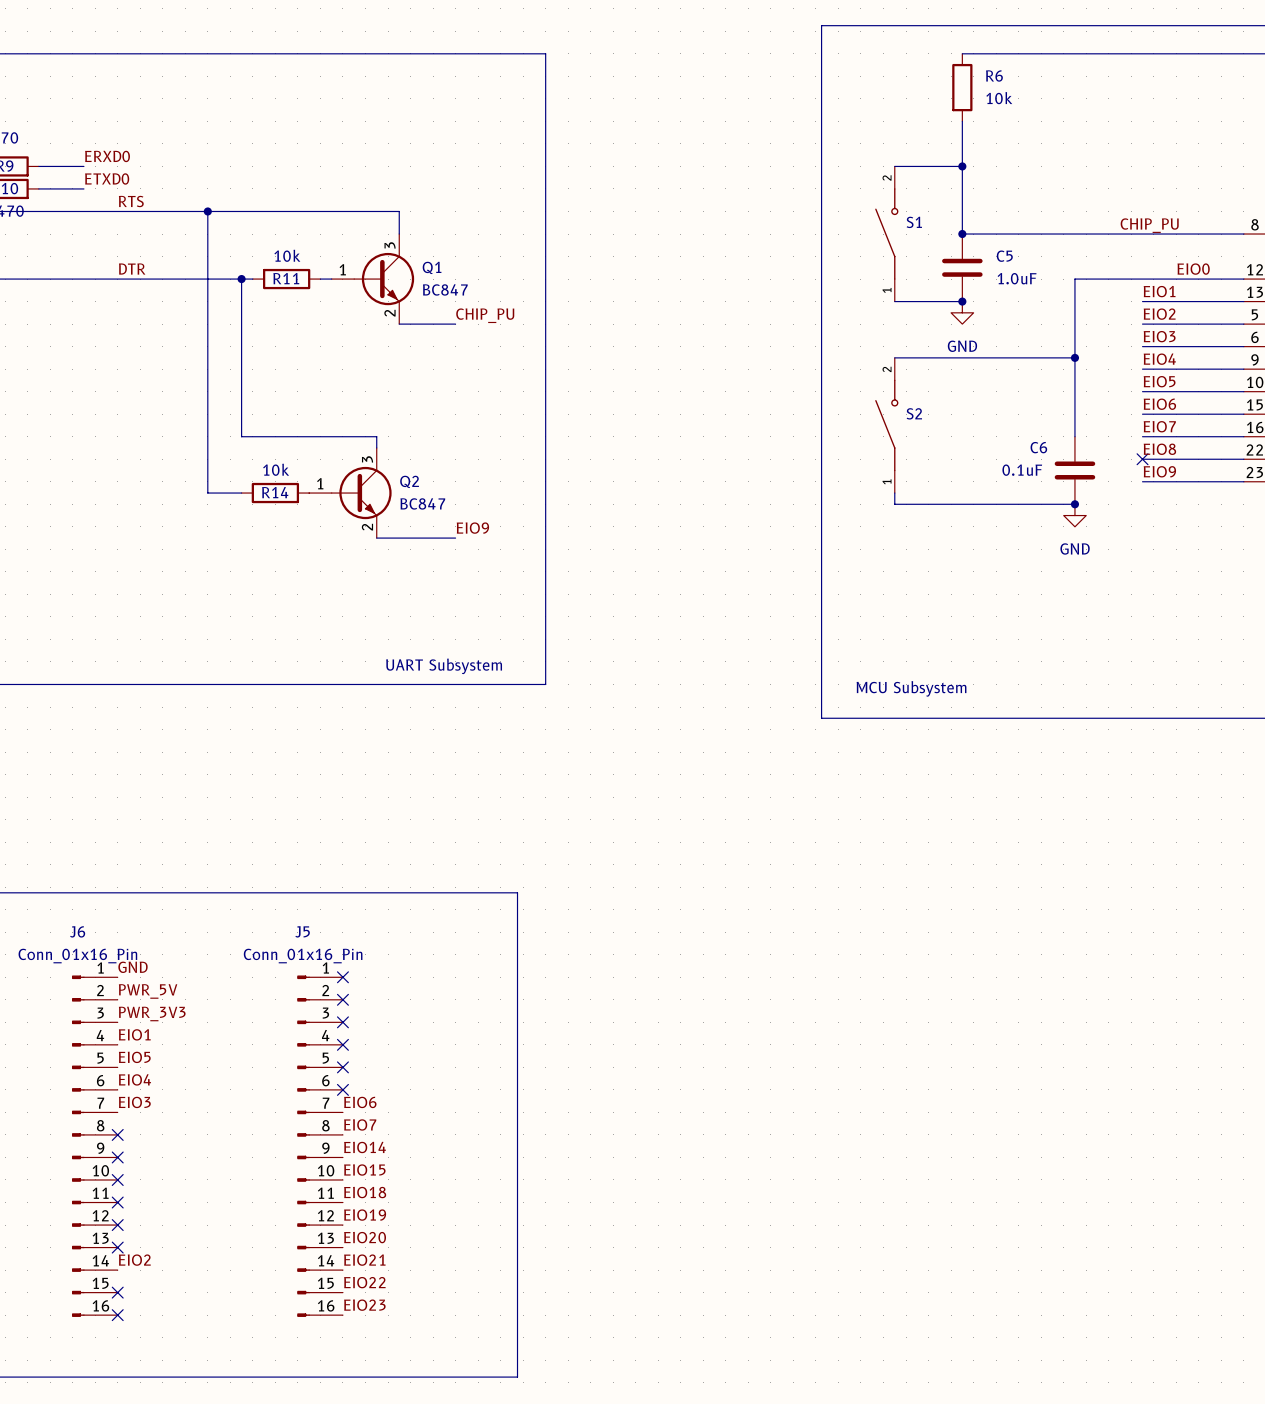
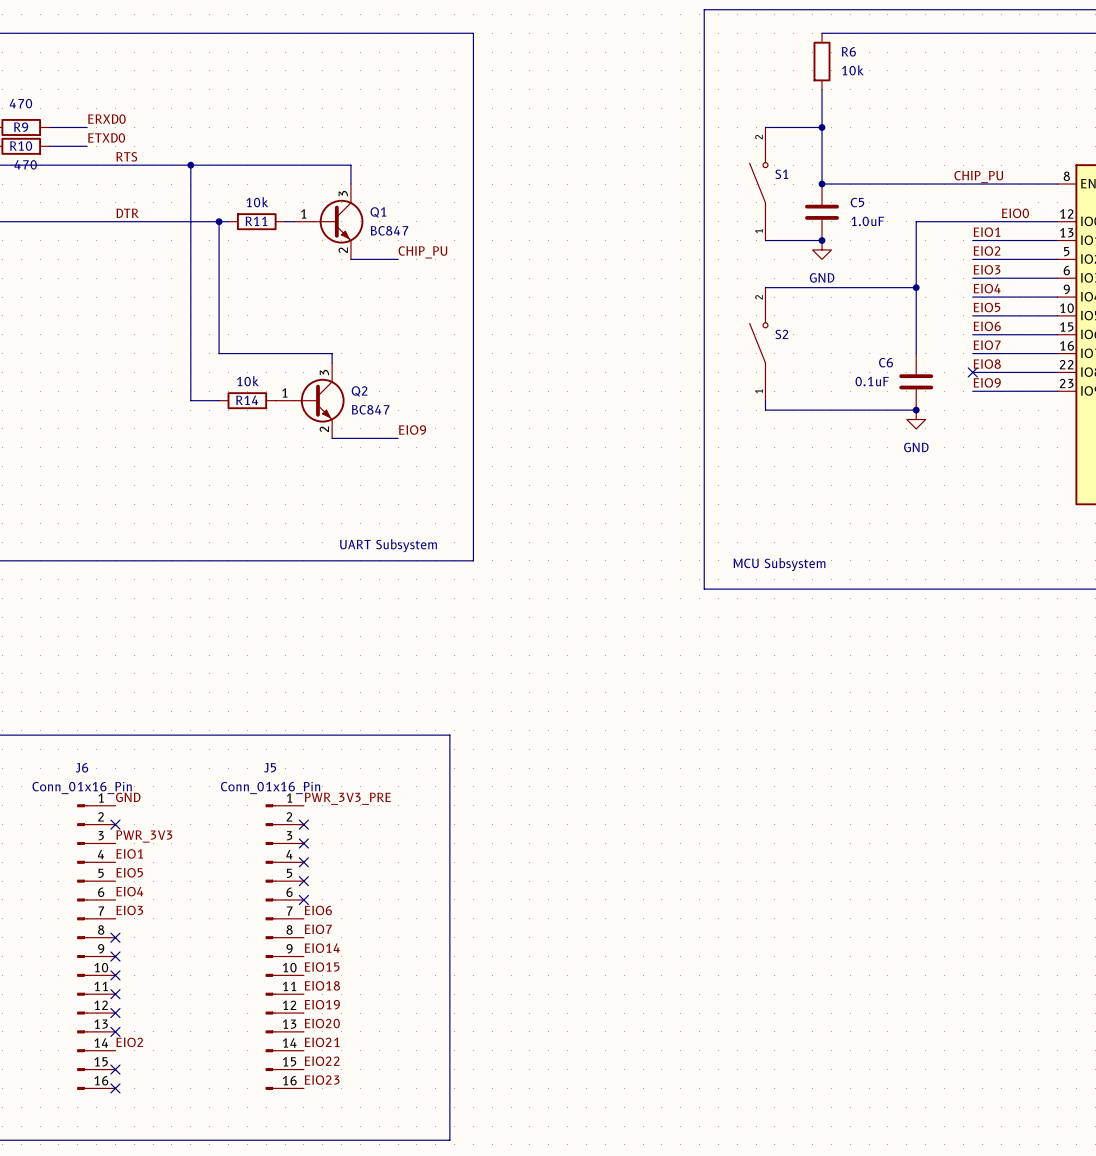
label: none -> PWR_3V3_PRE (347, 798)
no-connect mark: (342, 977) -> none
label: PWR_5V (148, 991) -> none
no-connect mark: none -> (115, 824)

